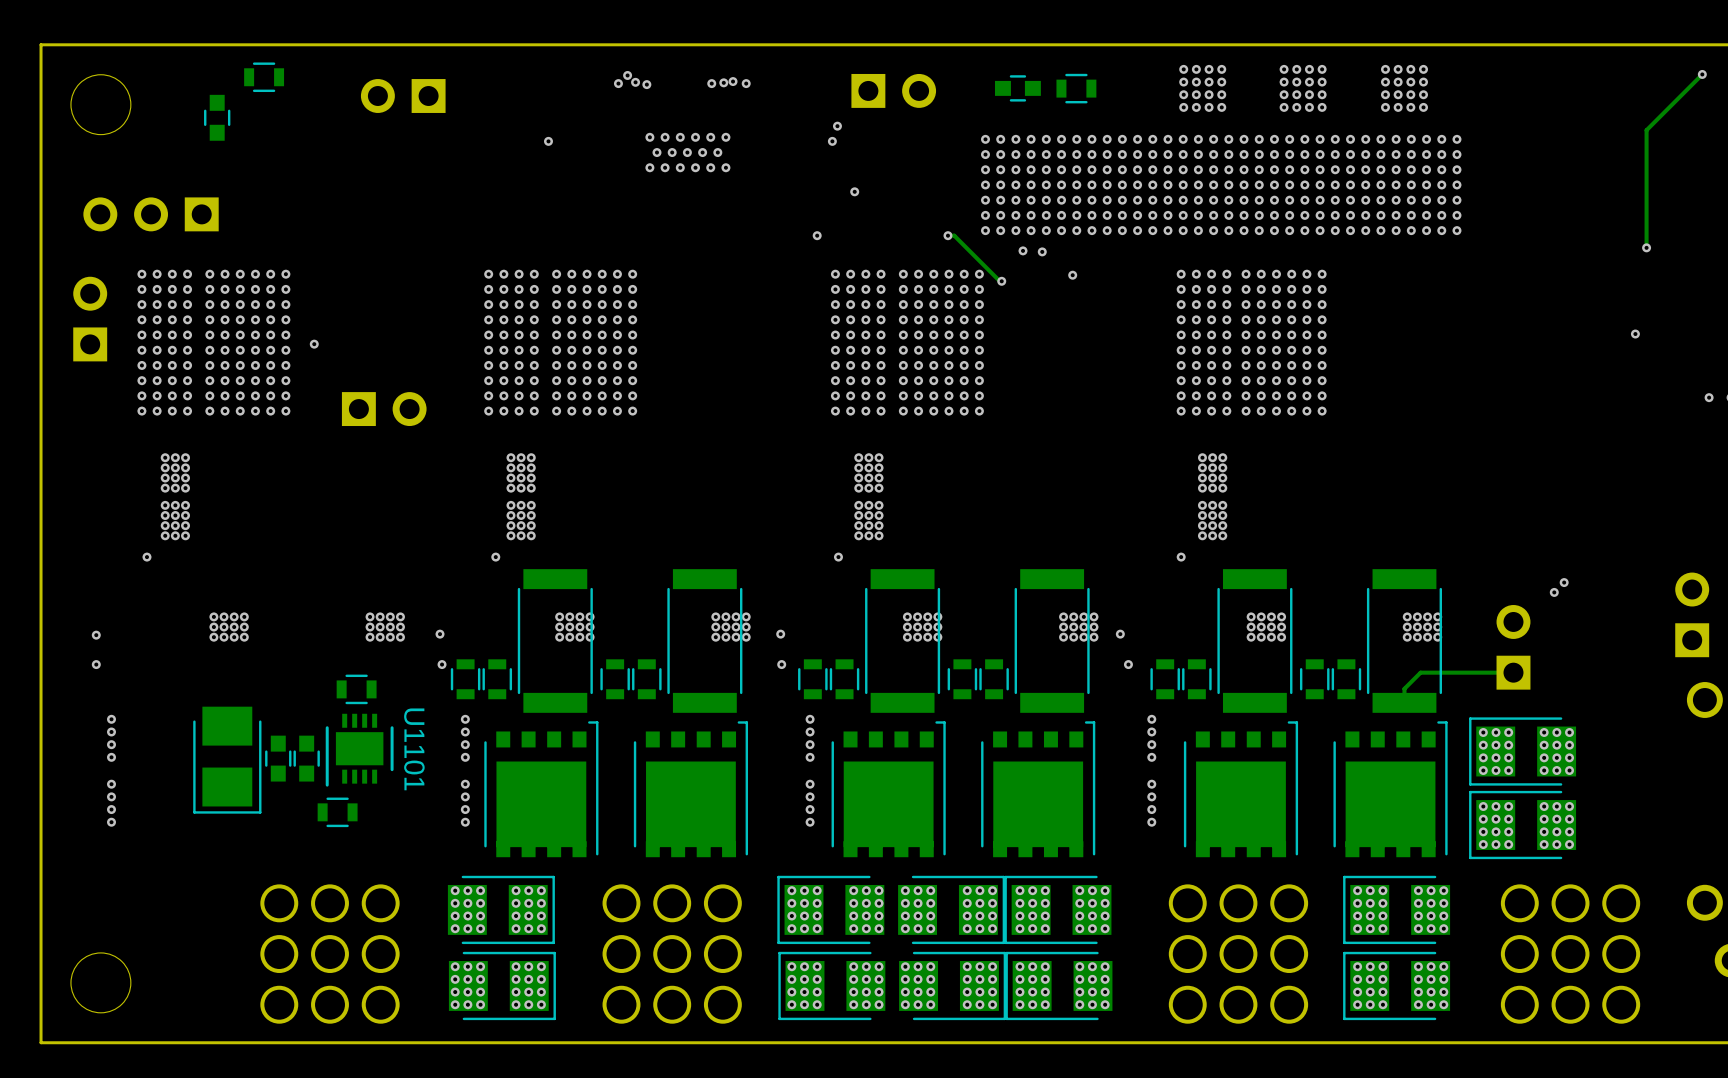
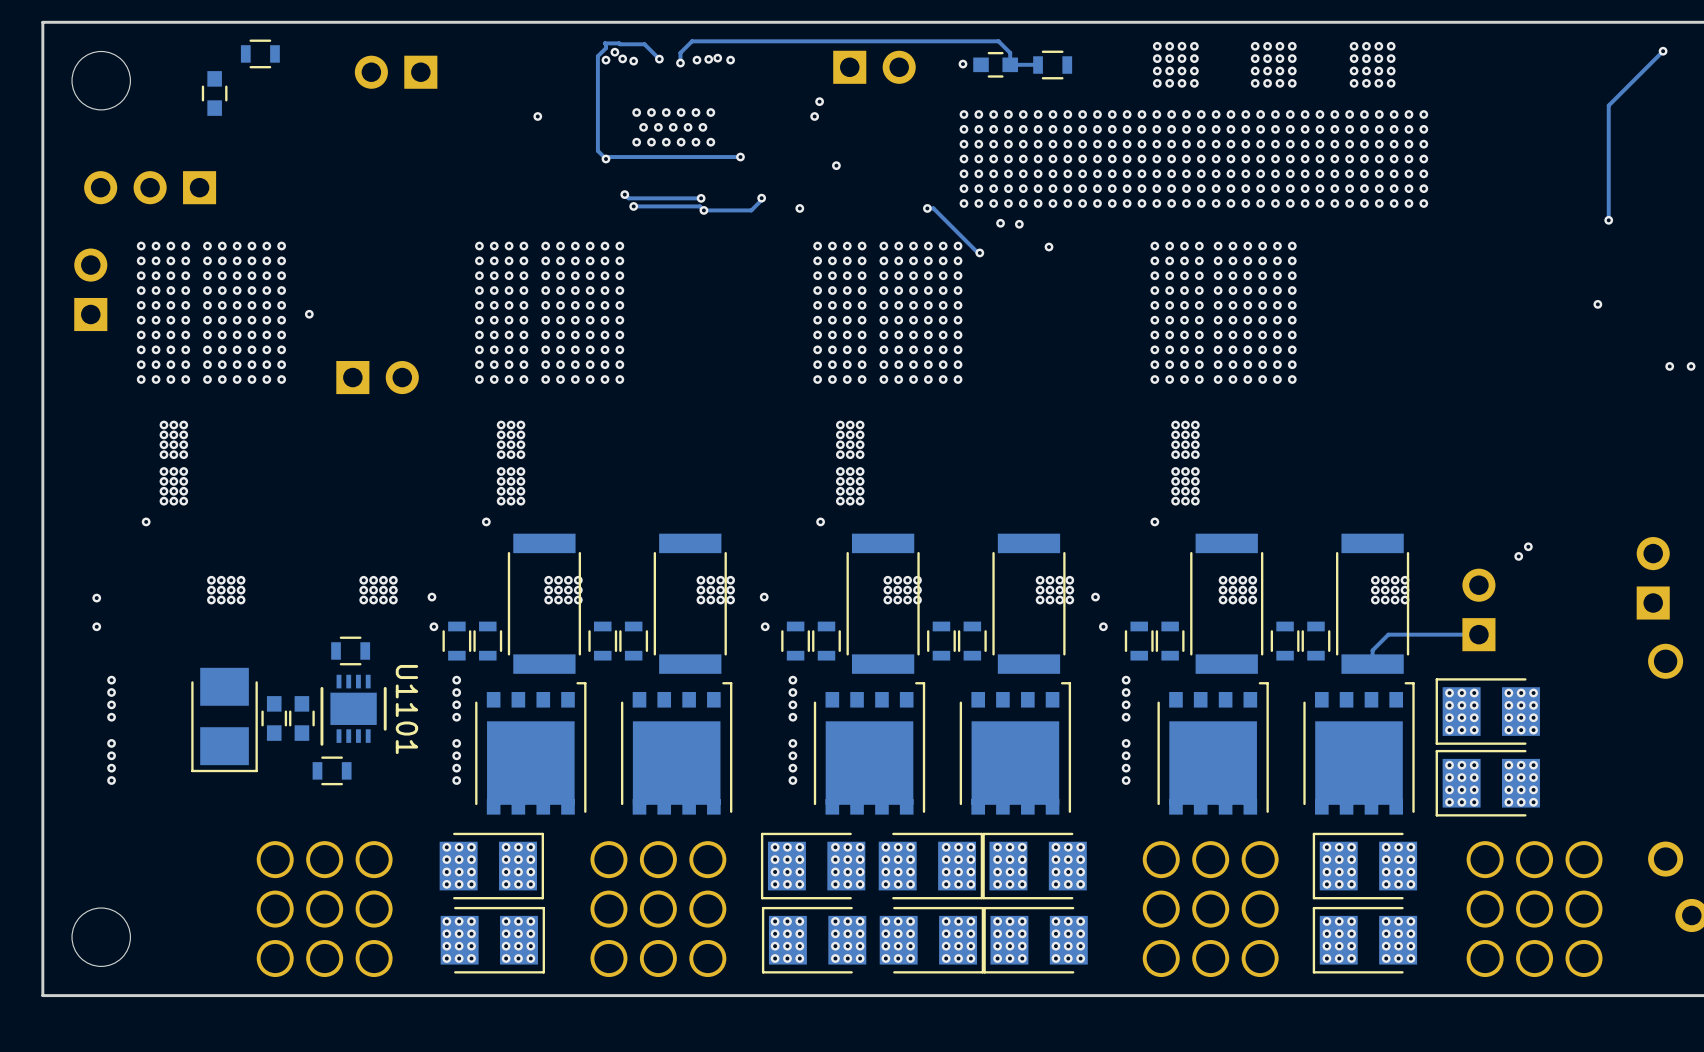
track: none -> (659, 59) (644, 44) (604, 43) (605, 48) (597, 56) (597, 150) (605, 159) (607, 157) (740, 157)
via: none -> (659, 59)
track: none -> (680, 63) (680, 52) (692, 41) (998, 41) (1010, 52) (1010, 64) (1037, 64)
via: none -> (680, 63)
via: none -> (962, 64)
via: none -> (740, 157)
via: none -> (605, 159)
track: none -> (624, 194) (628, 198) (701, 198)
via: none -> (624, 194)
via: none -> (701, 198)
track: none -> (761, 198) (751, 210) (703, 210) (699, 206) (633, 206)
via: none -> (761, 198)
via: none -> (633, 206)
via: none -> (703, 210)

